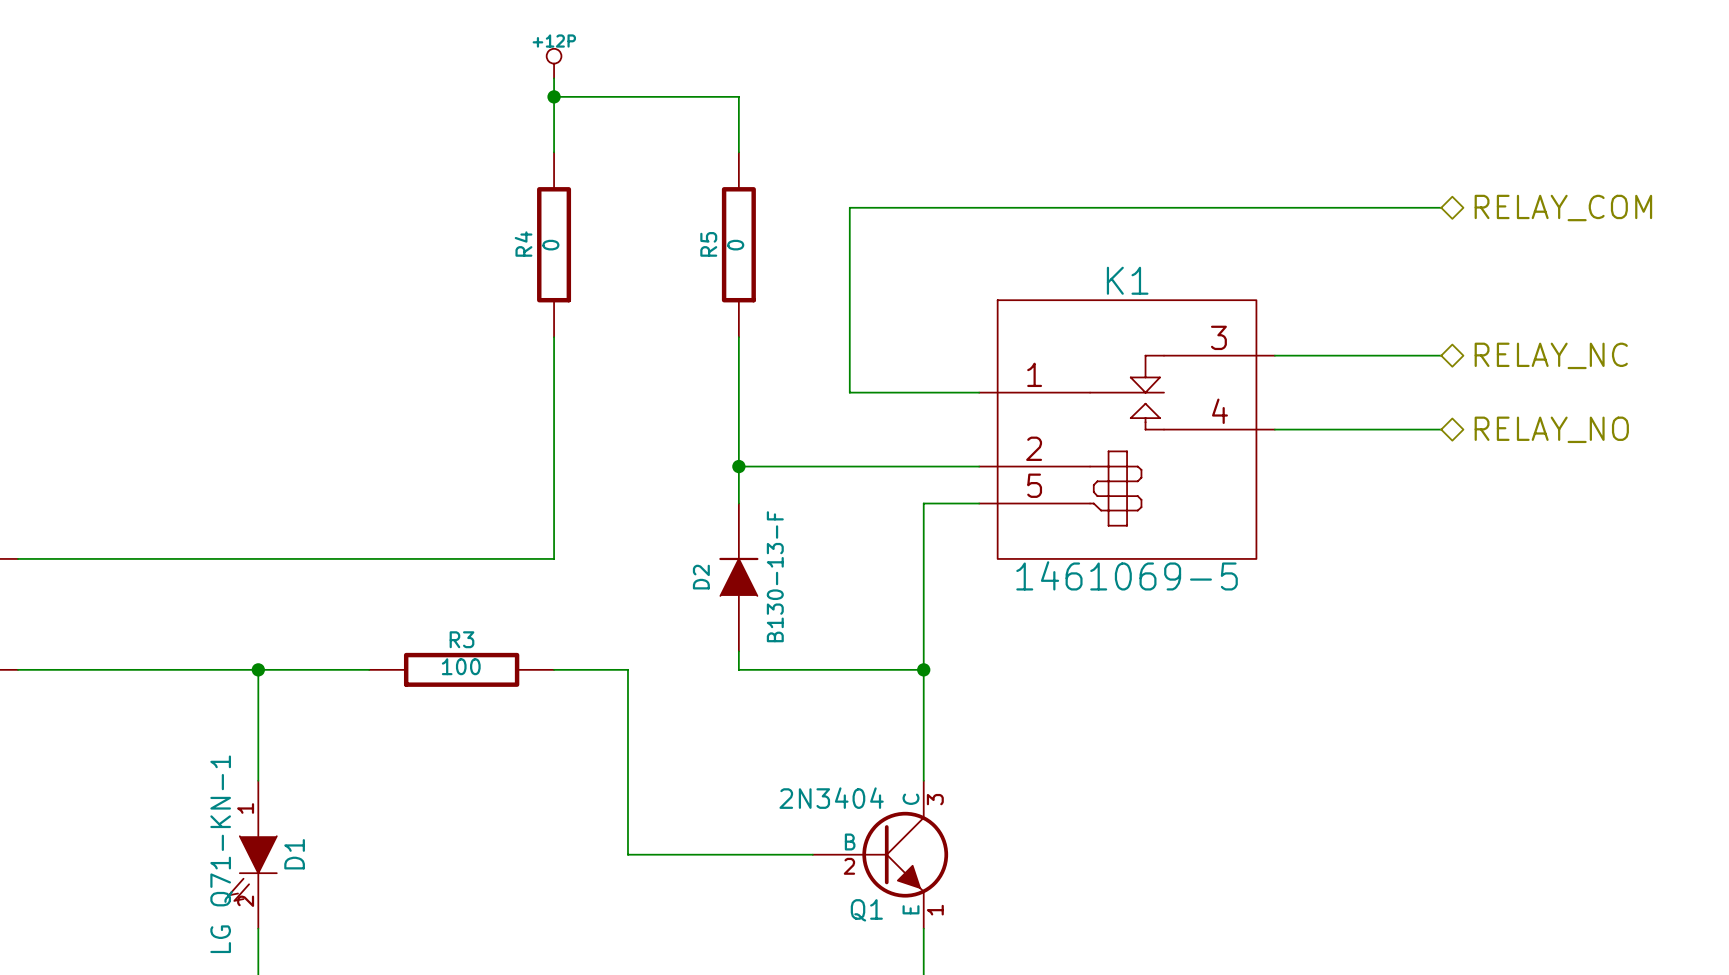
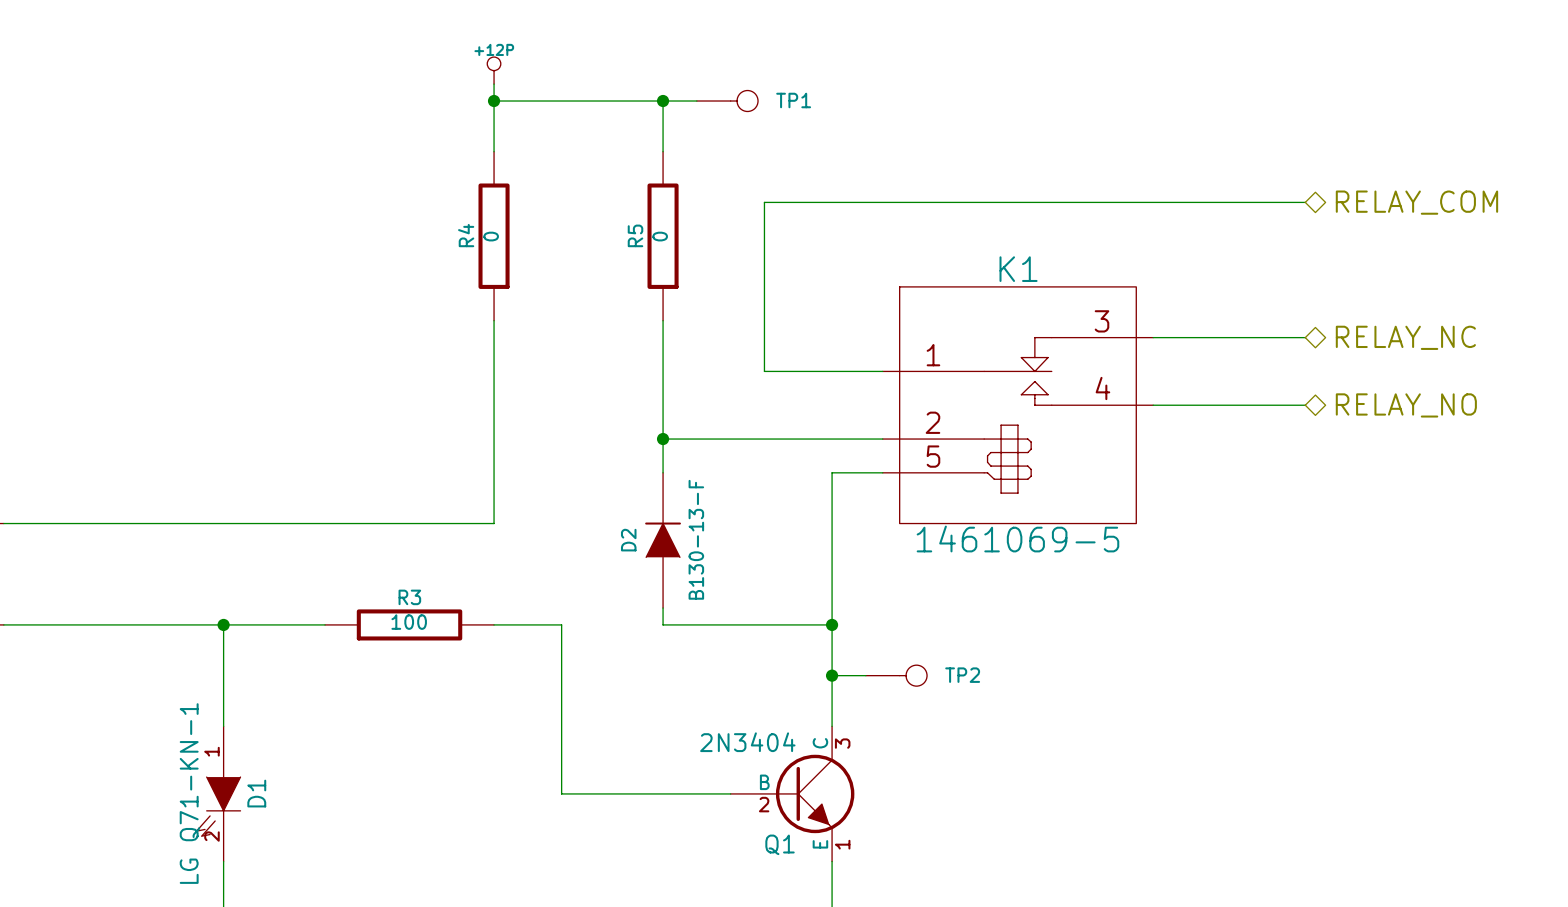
wire: none -> (663, 101) (696, 101)
junction: none -> (663, 101)
TP1: none -> (727, 101)
wire: none -> (832, 675) (865, 675)
junction: none -> (832, 675)
TP2: none -> (896, 675)

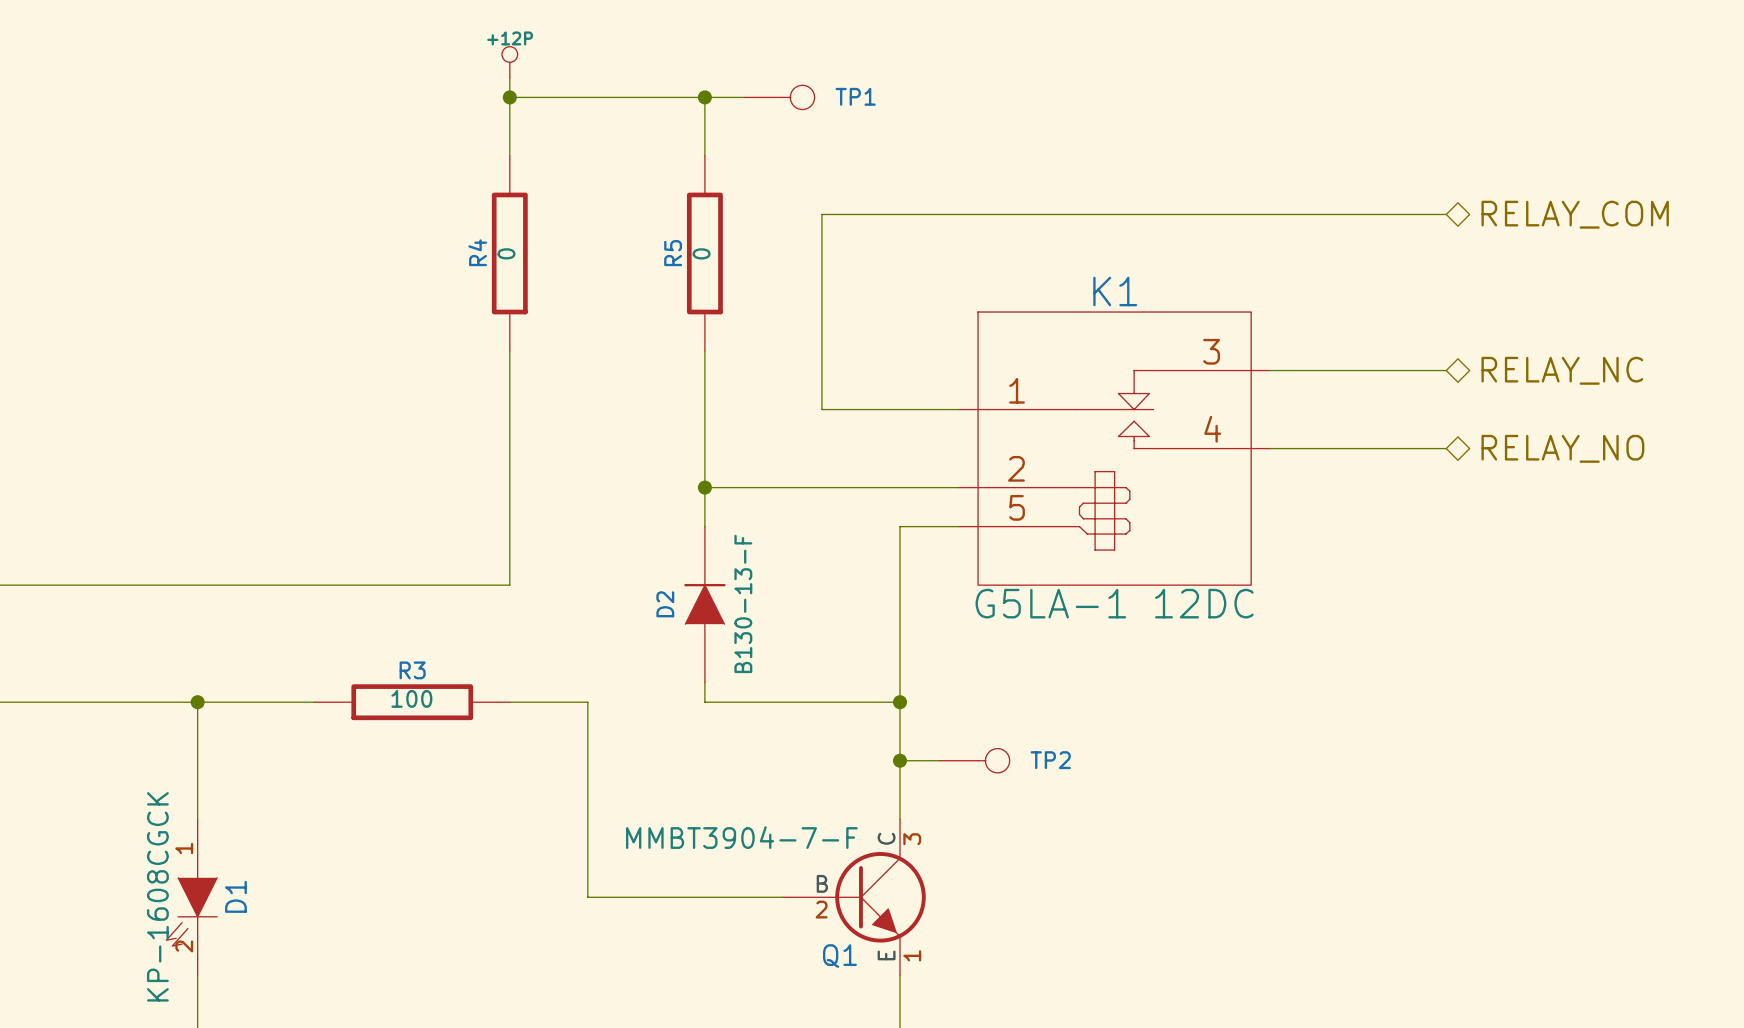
K1 value: 1461069-5 (1017, 538) -> G5LA-1 12DC (1114, 603)
Q1 value: 2N3404 (747, 742) -> MMBT3904-7-F (741, 837)
D1 value: LG Q71-KN-1 (189, 793) -> KP-1608CGCK (157, 896)

